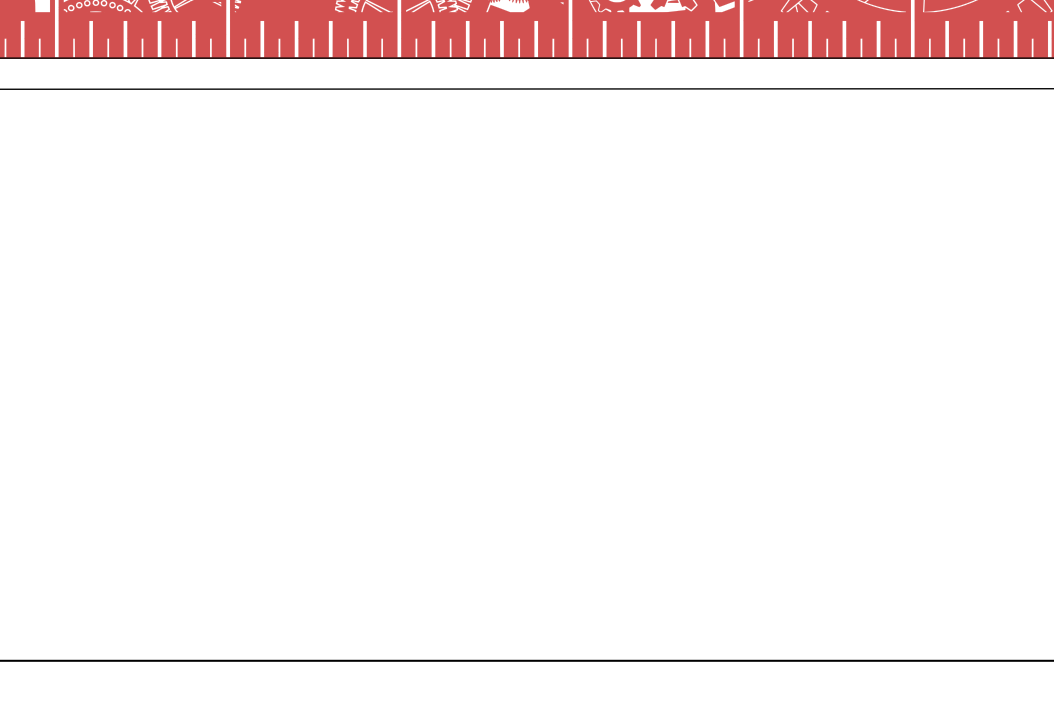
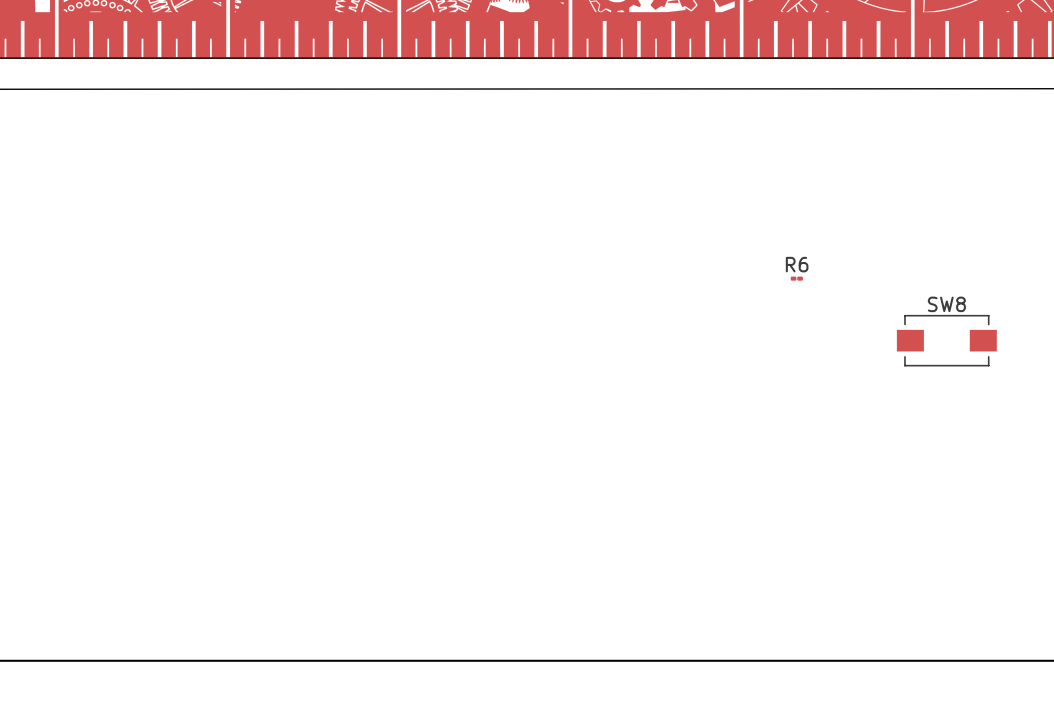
R6: none -> (796, 278)
SW8: none -> (946, 340)

